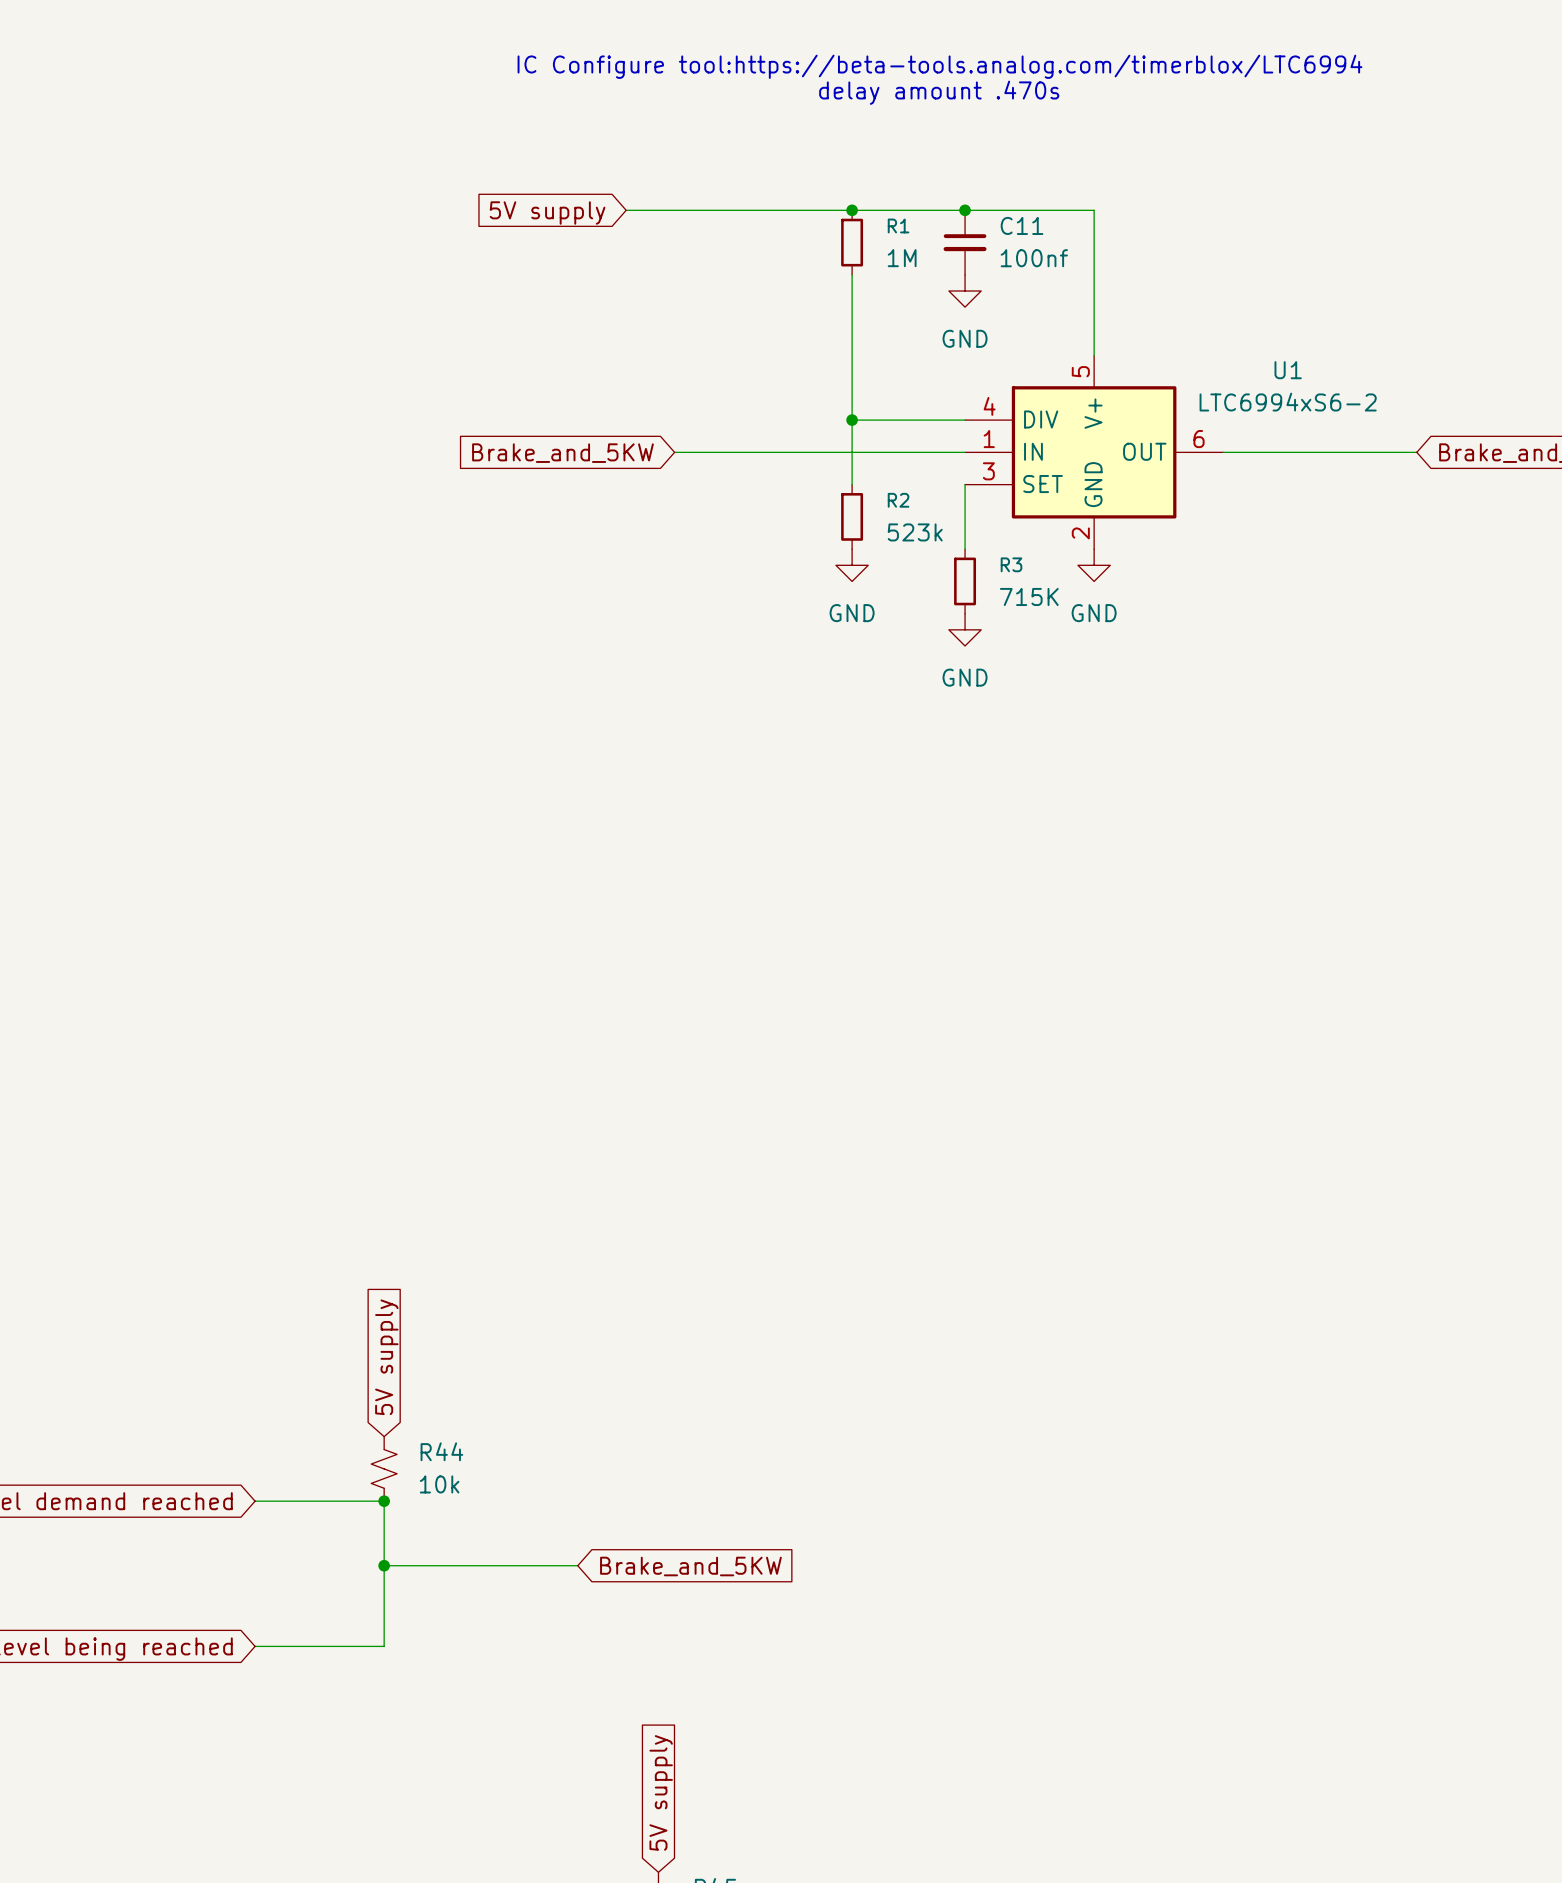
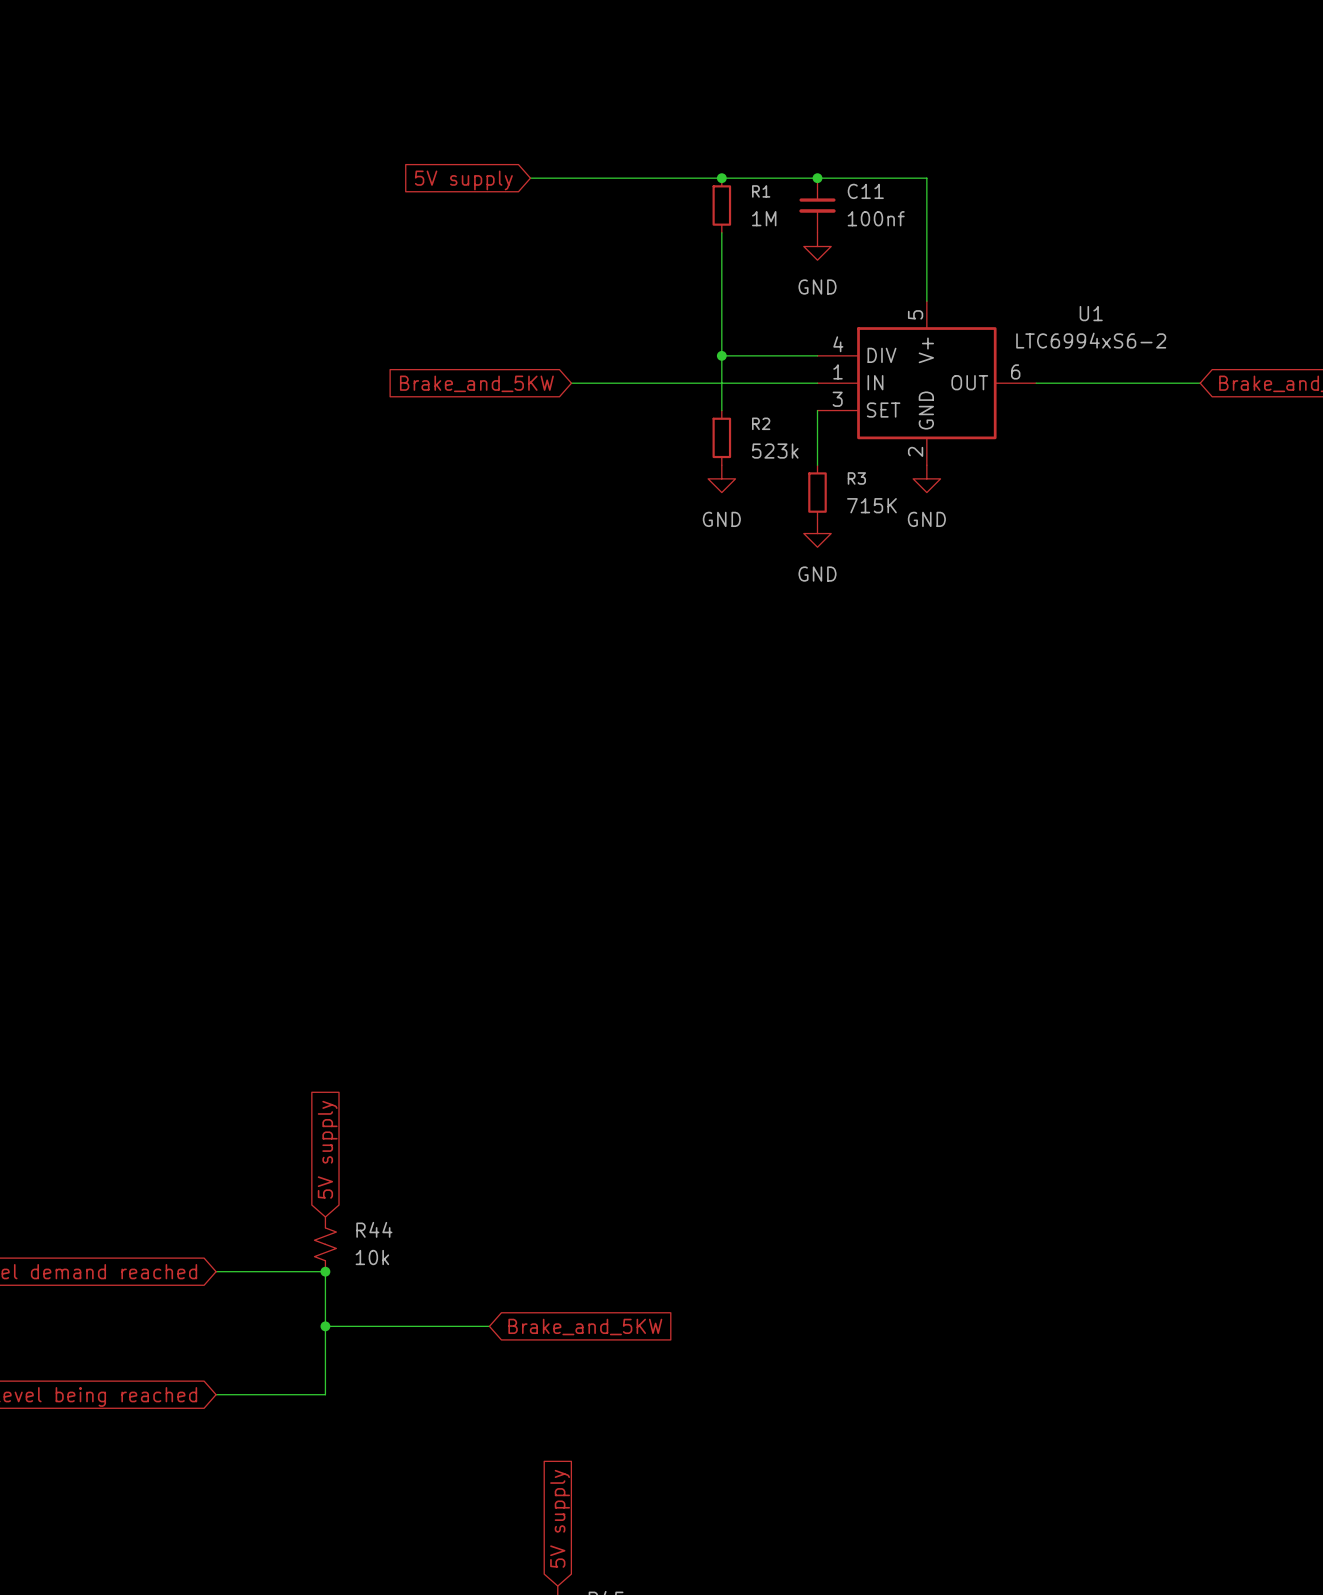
text: IC Configure tool:https://beta-tools.analog.com/timerblox/LTC6994 (939, 66) -> none
text: delay amount .470s (939, 92) -> none

